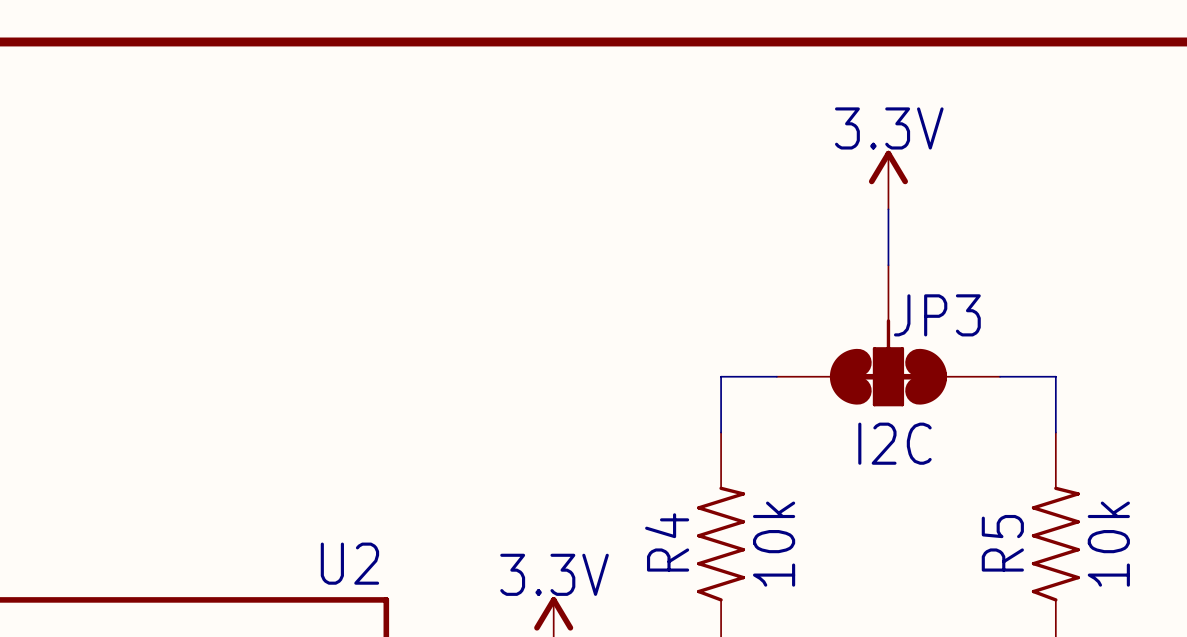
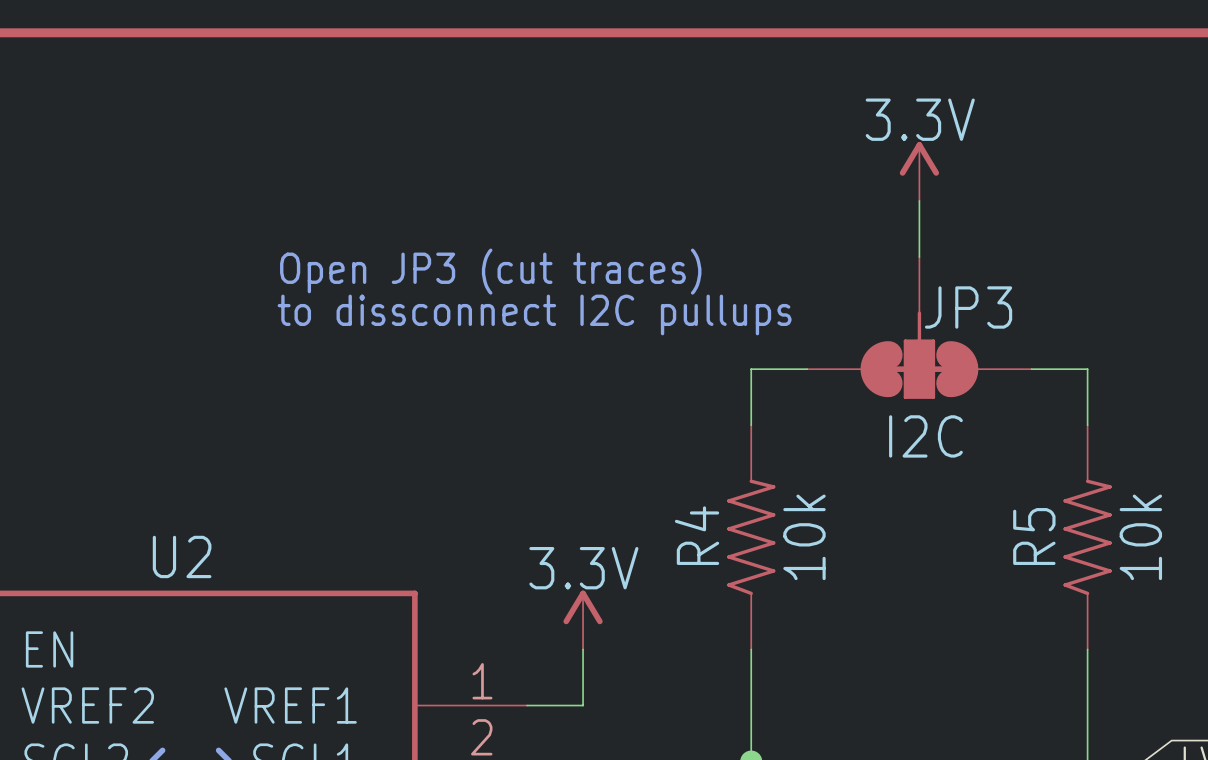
text: none -> Open JP3 (cut traces) (490, 271)
text: none -> to dissconnect I2C pullups (534, 314)
U2 name position: U2 (349, 563) -> U2 (182, 556)

